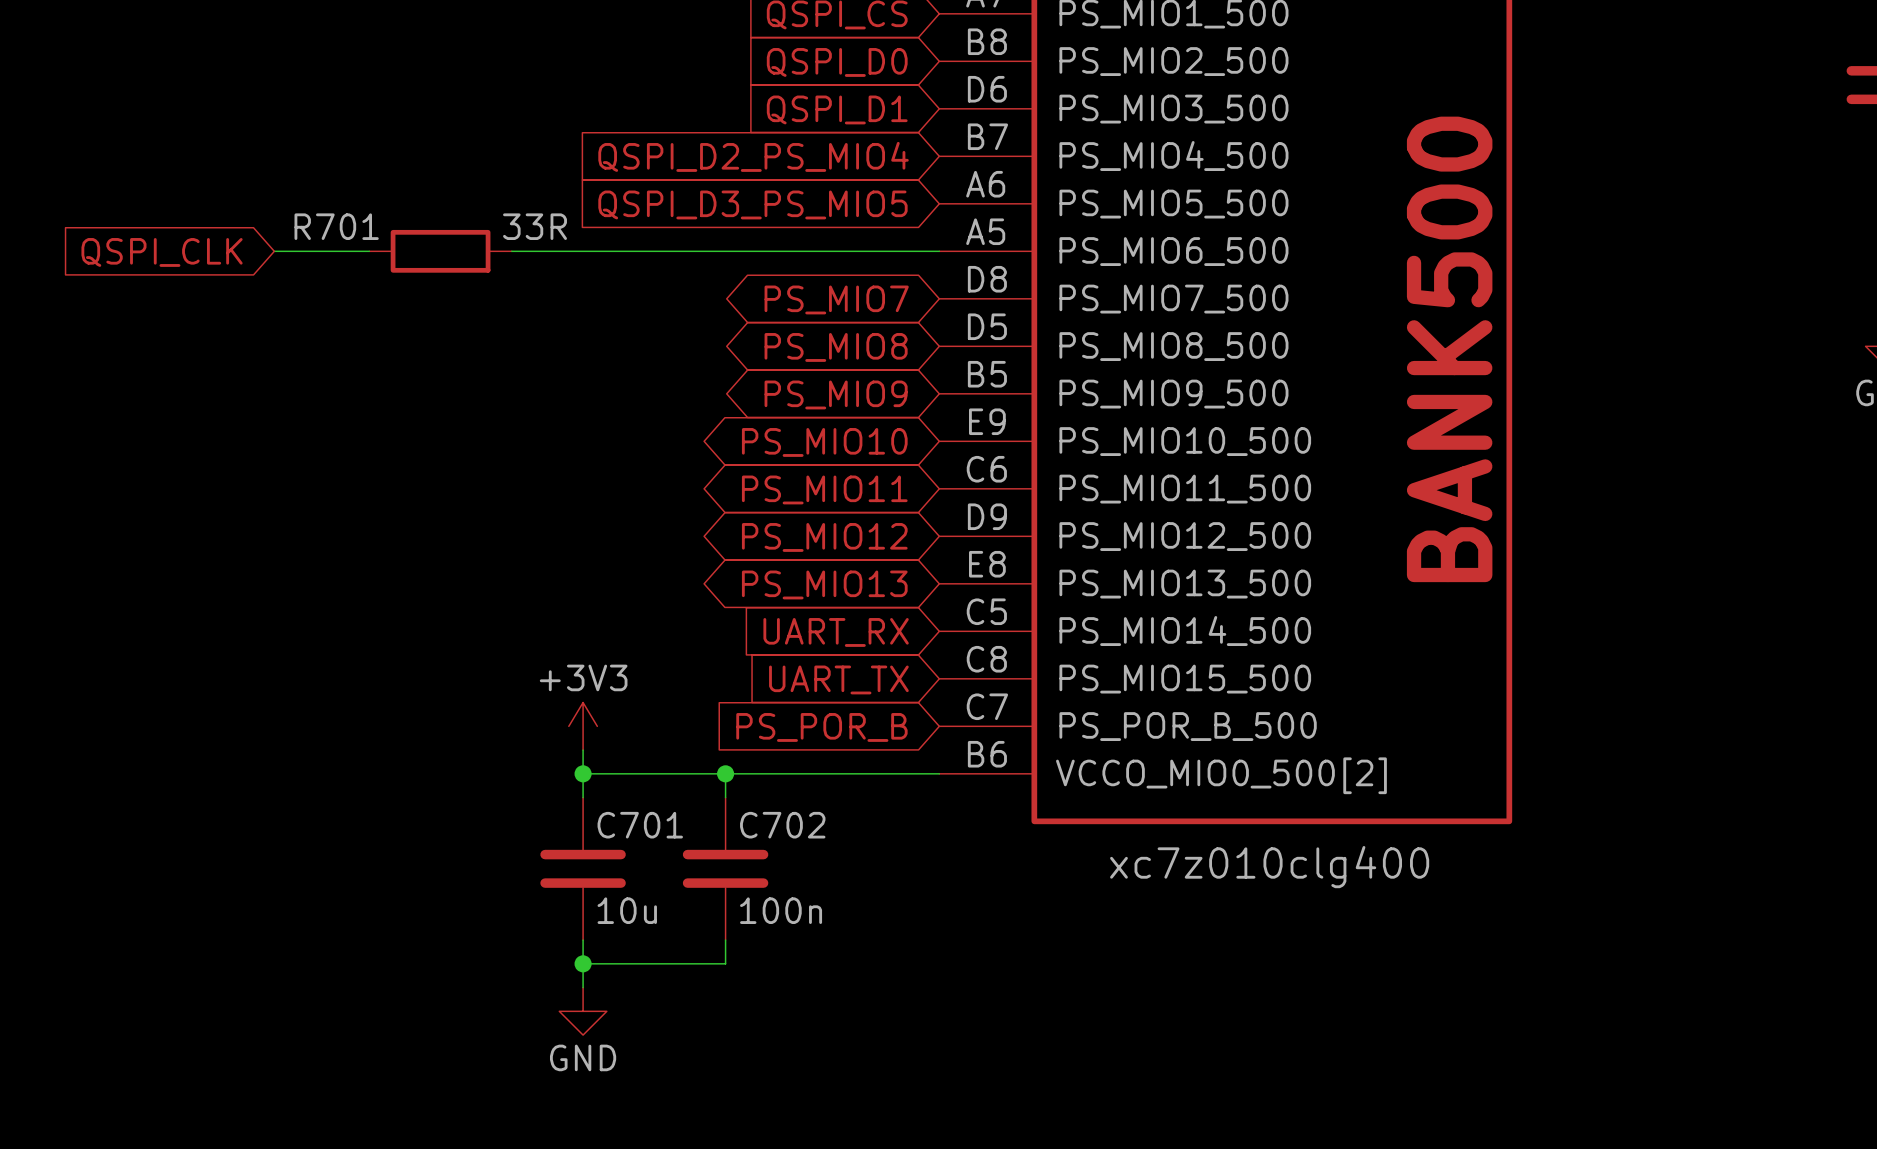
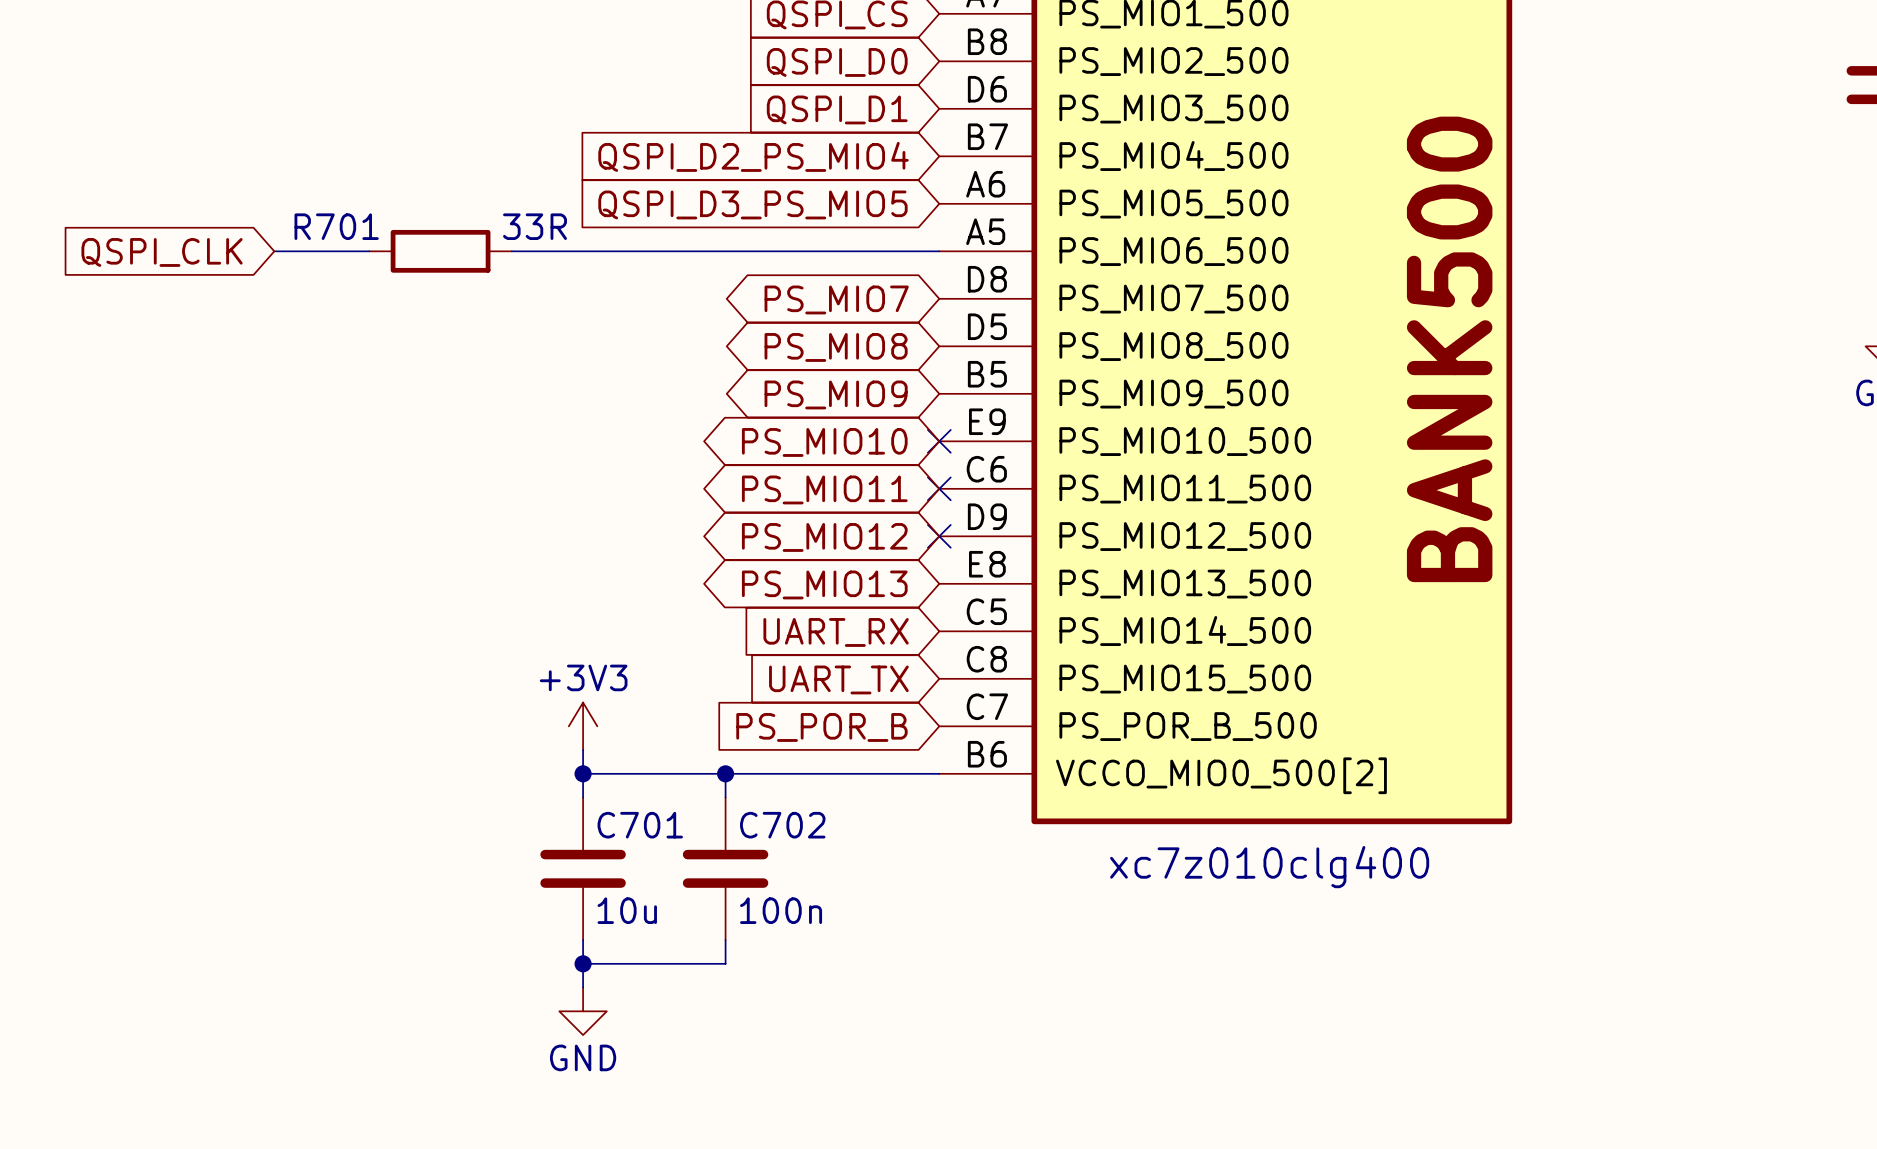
no-connect mark: none -> (939, 441)
no-connect mark: none -> (939, 488)
no-connect mark: none -> (939, 536)

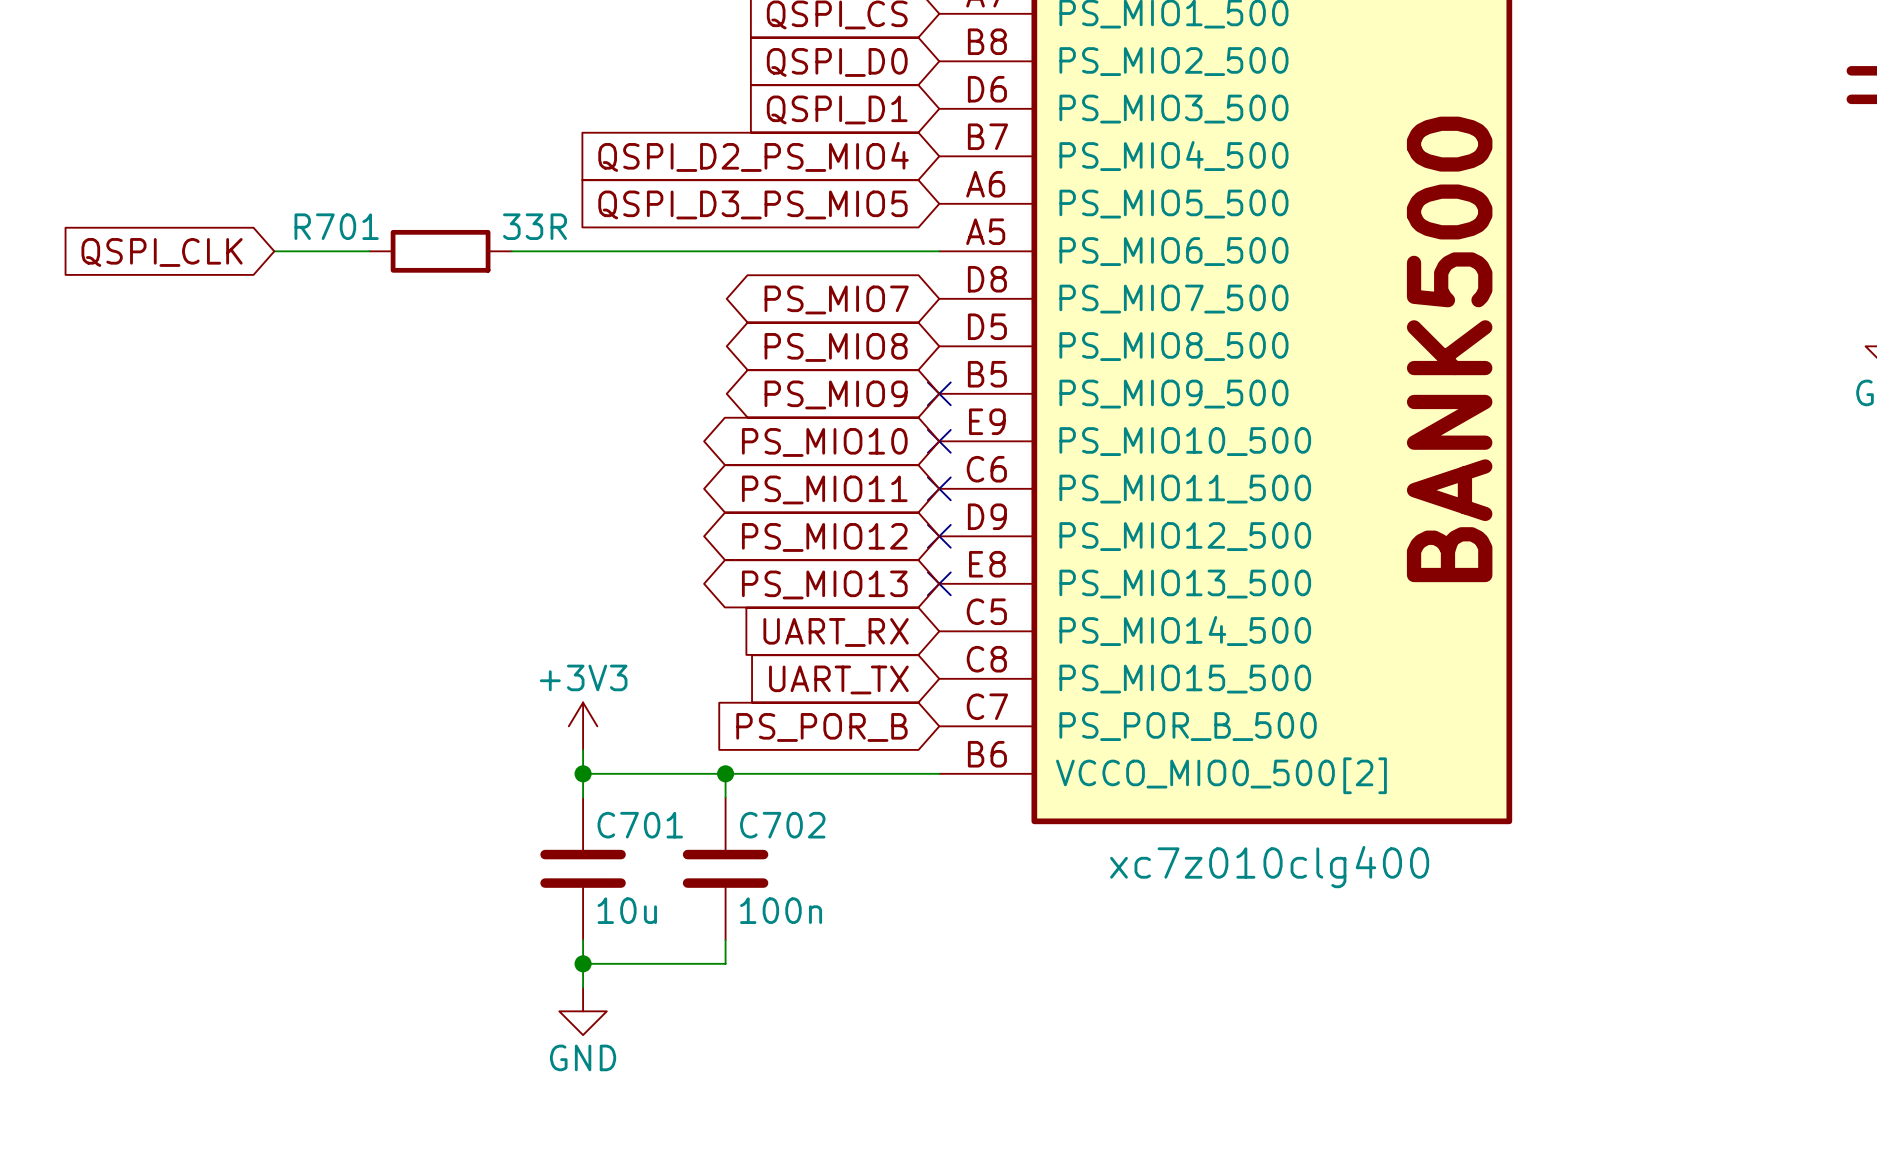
no-connect mark: none -> (939, 393)
no-connect mark: none -> (939, 583)

